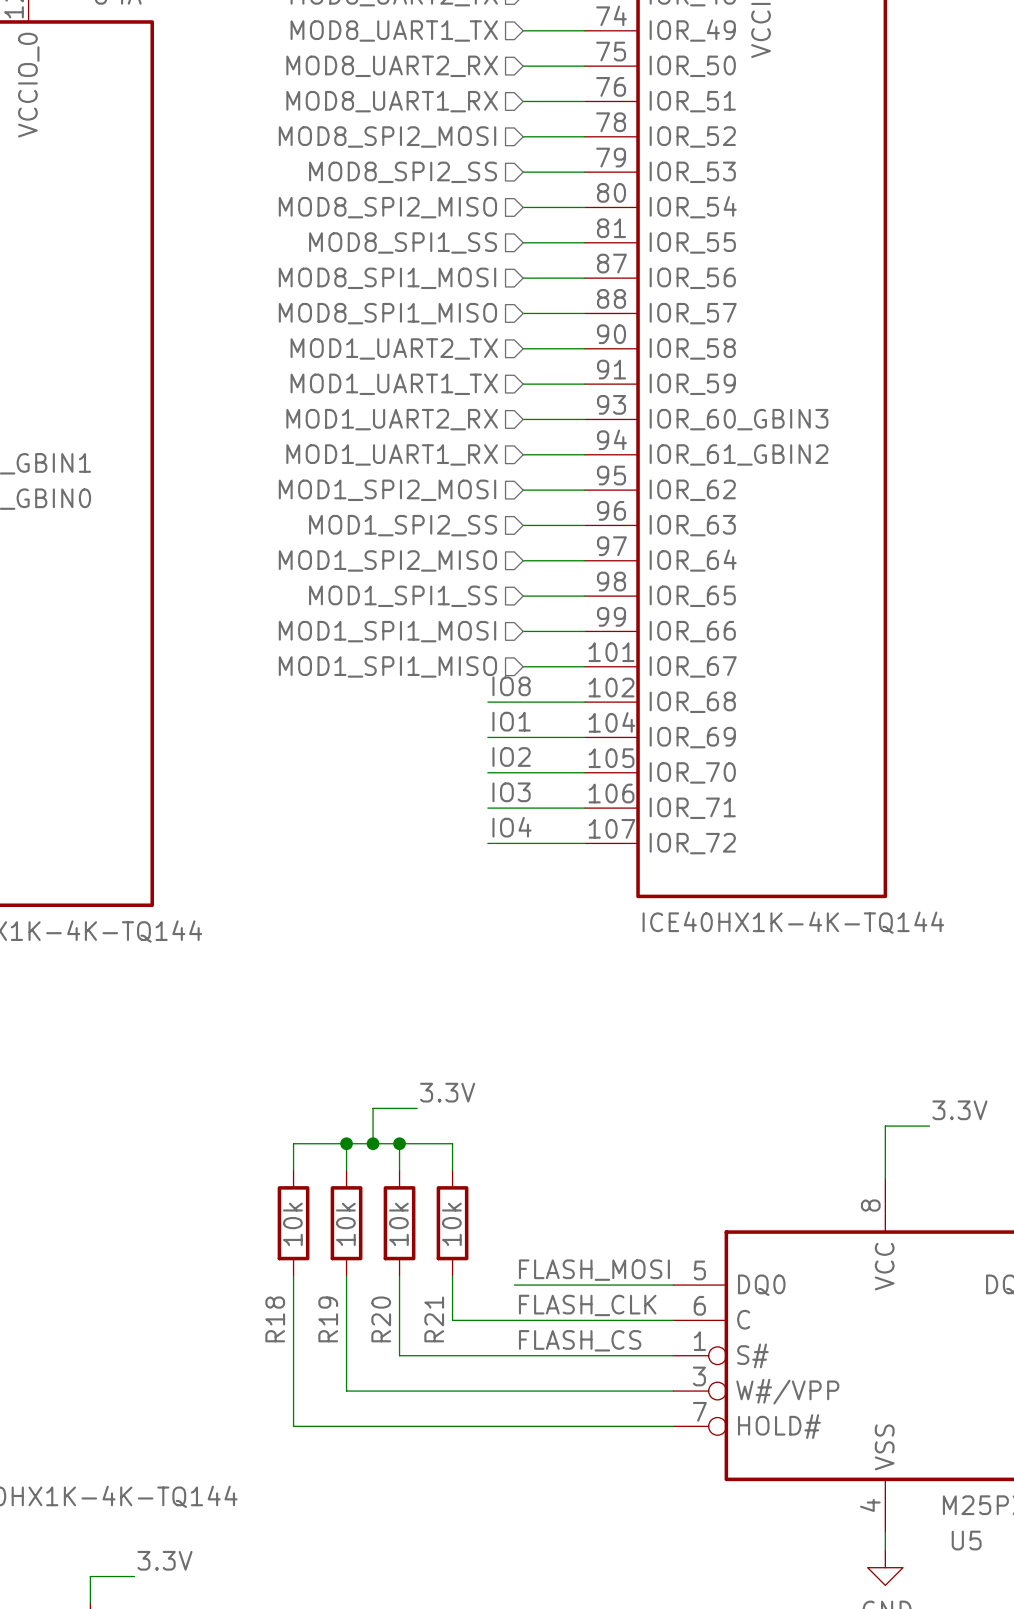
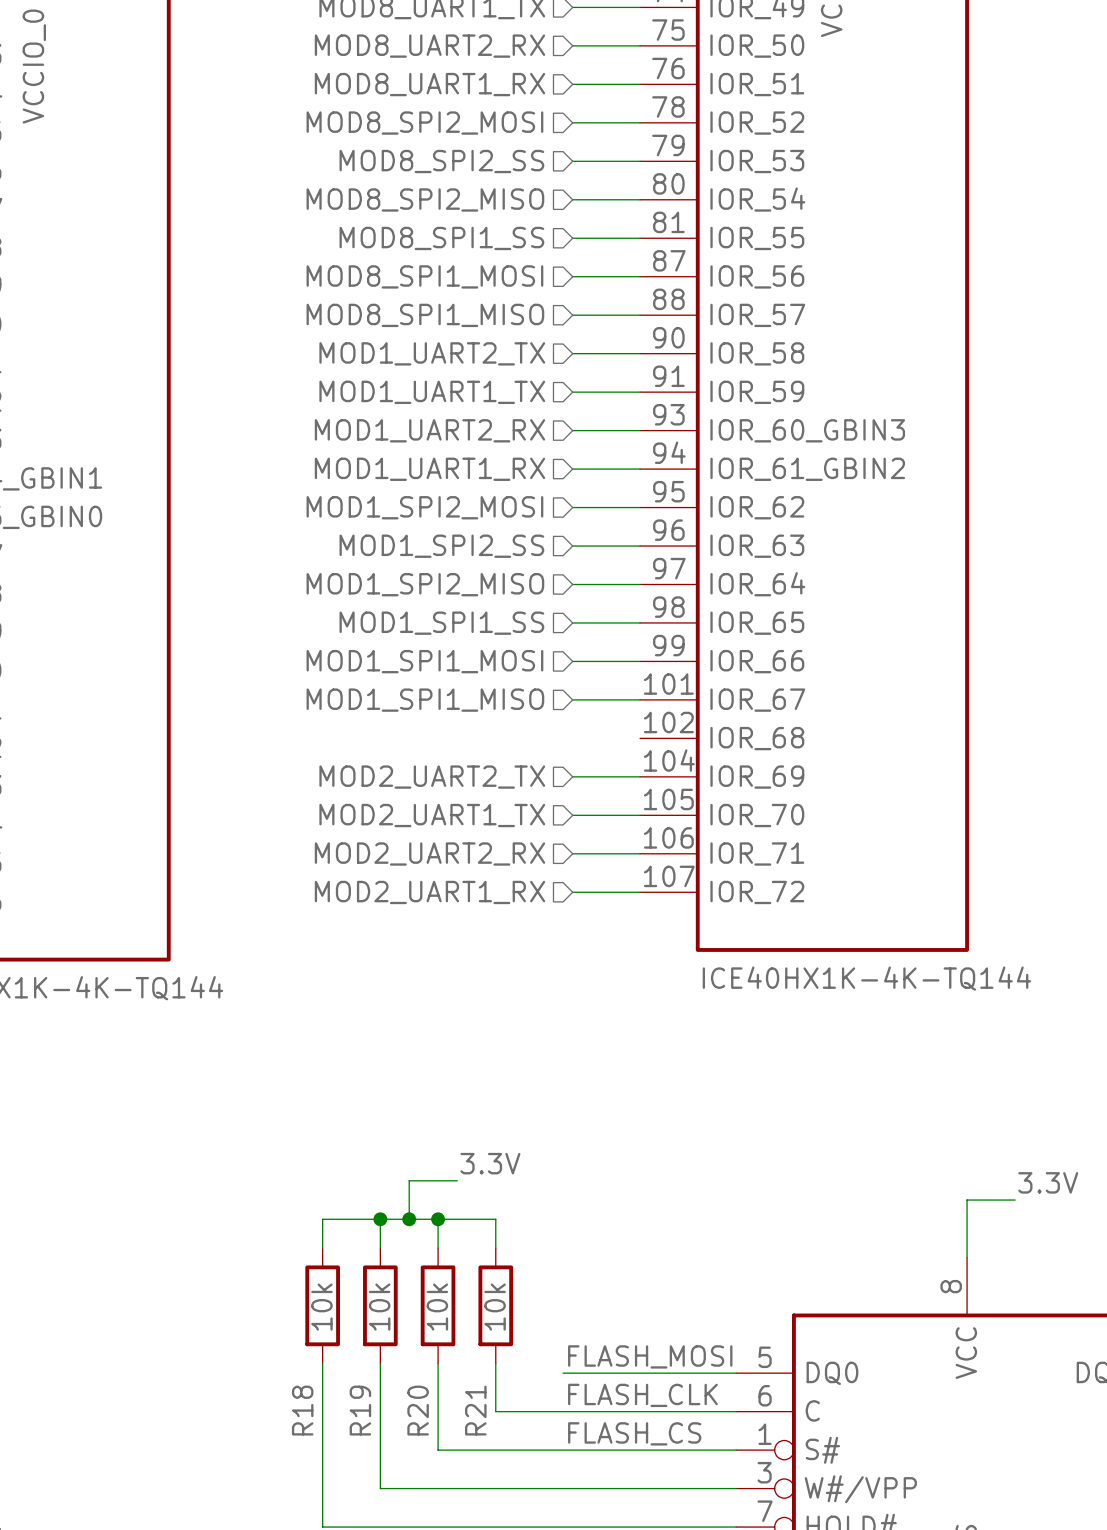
label: IO8 (511, 686) -> none
wire: (487, 702) (585, 702) -> none
label: IO1 (511, 721) -> none
hierarchical label: none -> MOD2_UART2_TX (432, 777)
wire: (487, 737) (523, 737) -> none
label: IO2 (511, 756) -> none
hierarchical label: none -> MOD2_UART1_TX (432, 815)
wire: (487, 772) (523, 772) -> none
label: IO3 (511, 792) -> none
hierarchical label: none -> MOD2_UART2_RX (429, 853)
wire: (487, 808) (523, 808) -> none
label: IO4 (511, 827) -> none
hierarchical label: none -> MOD2_UART1_RX (429, 892)
wire: (487, 843) (523, 843) -> none

